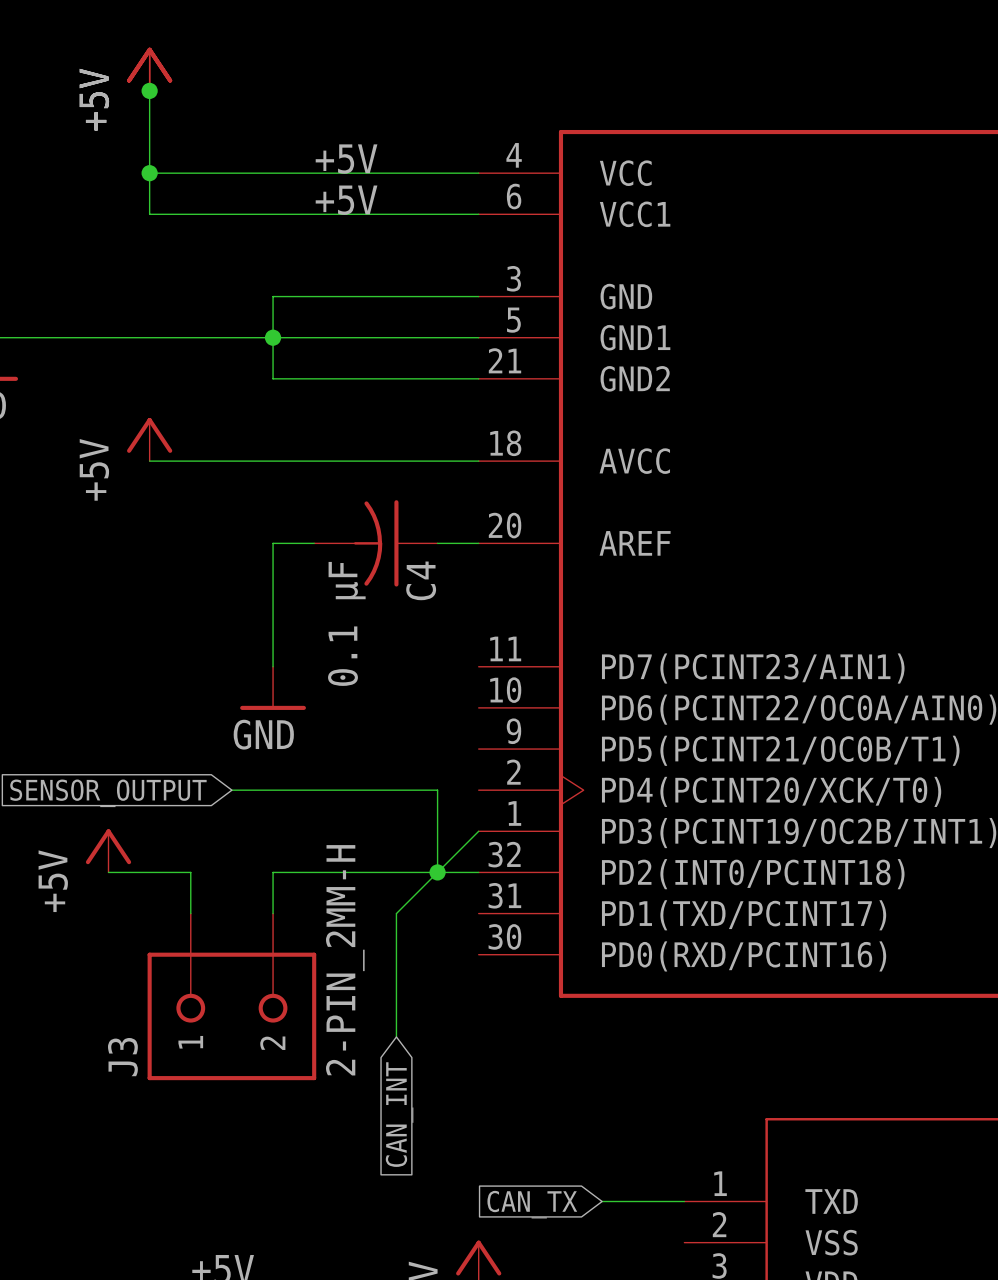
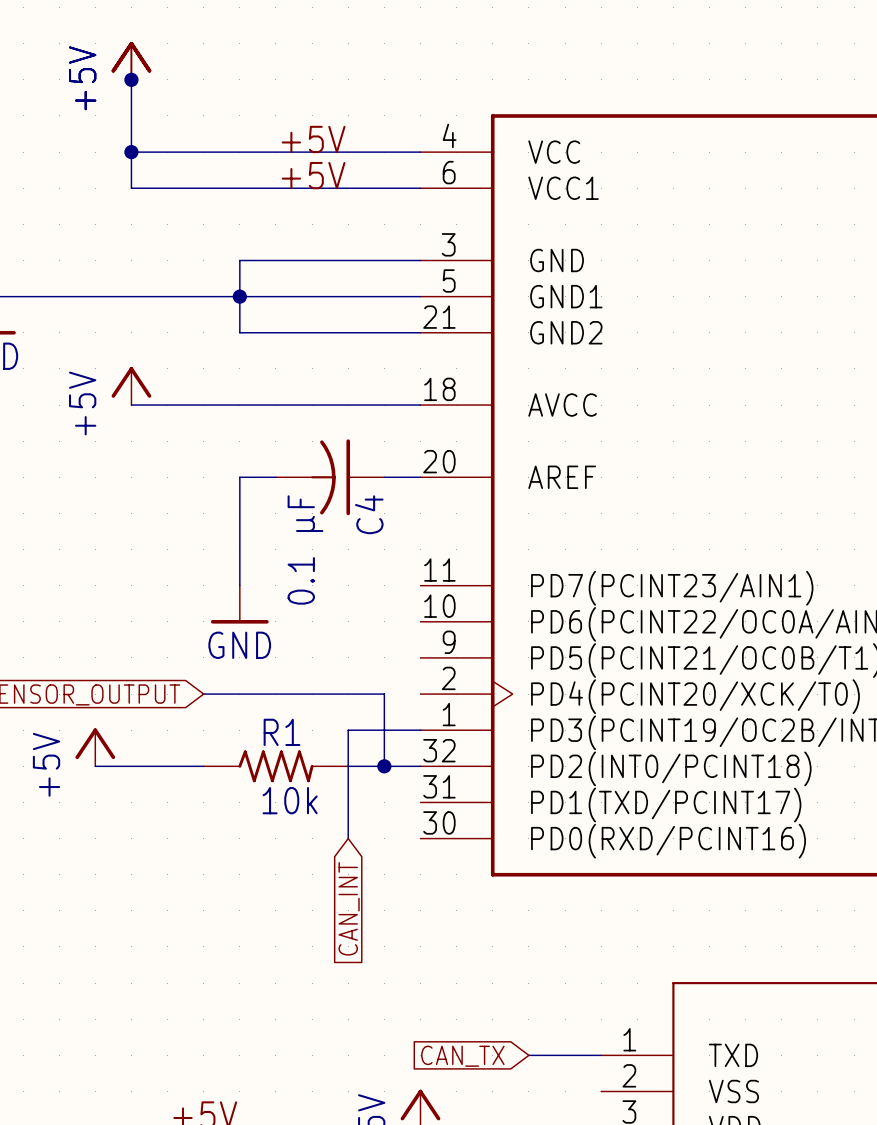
wire: (478, 831) (396, 913) -> (420, 730) (348, 730) (348, 802)
wire: (190, 872) (190, 913) -> (167, 766) (203, 766)
R1: none -> 10k (275, 766)
wire: (396, 872) (273, 872) (273, 913) -> none
wire: (396, 954) (396, 1036) -> none
J3: 2-PIN_2MM-H (231, 996) -> none
global label position: CAN_INT (399, 1114) -> CAN_INT (349, 908)

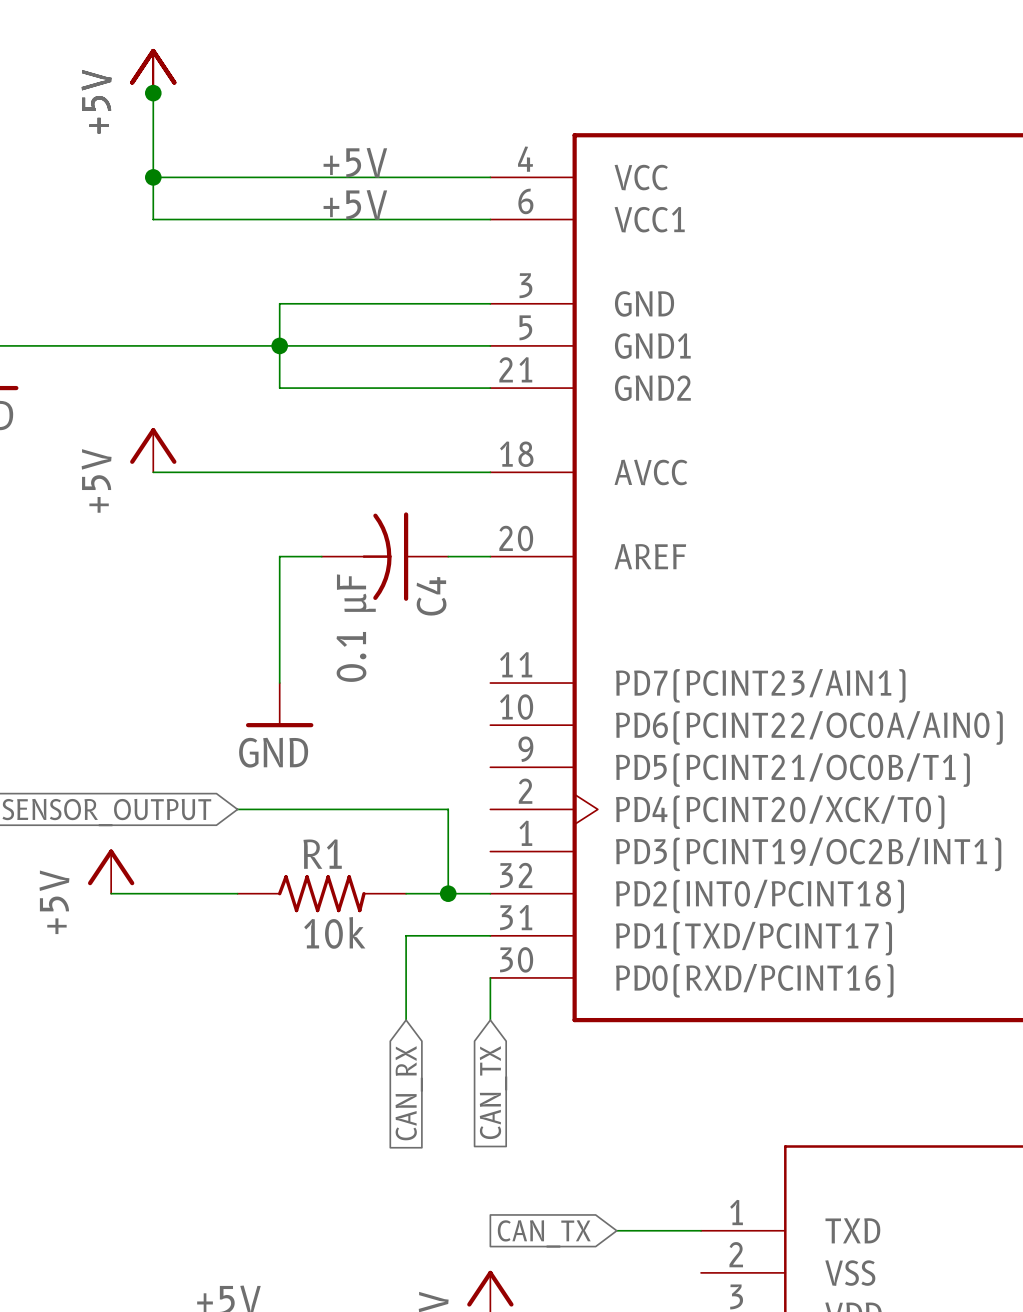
wire: (420, 730) (348, 730) (348, 802) -> (490, 935) (406, 935)
wire: none -> (406, 977) (406, 1020)
wire: none -> (490, 977) (490, 1020)
global label: CAN_INT (349, 908) -> CAN_RX (409, 1093)
global label: none -> CAN_TX (493, 1092)

